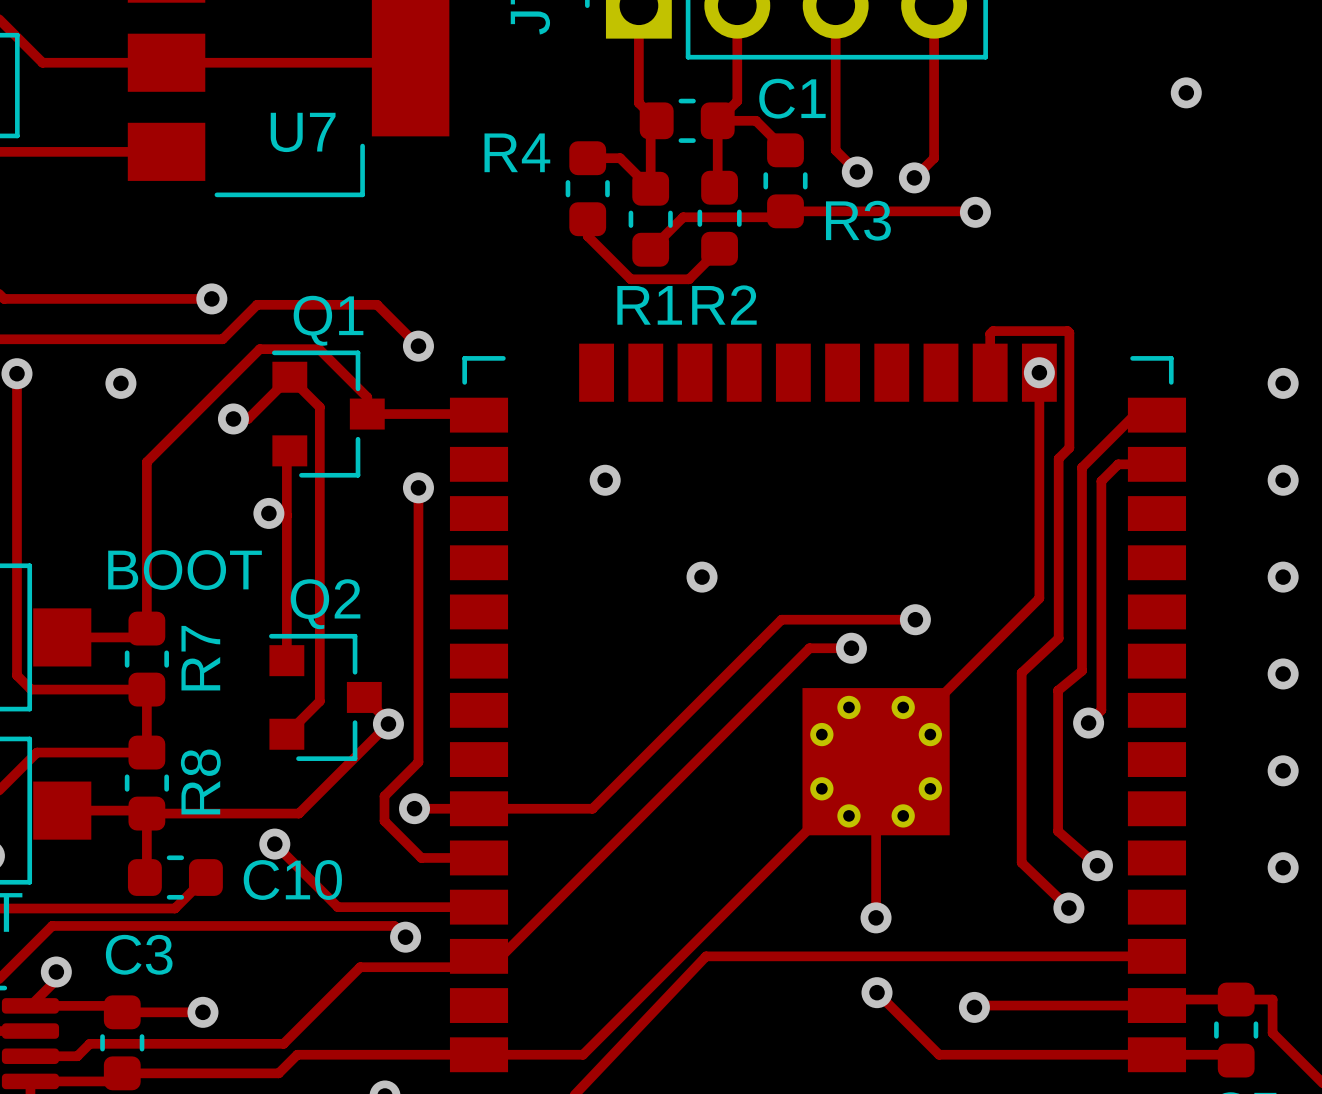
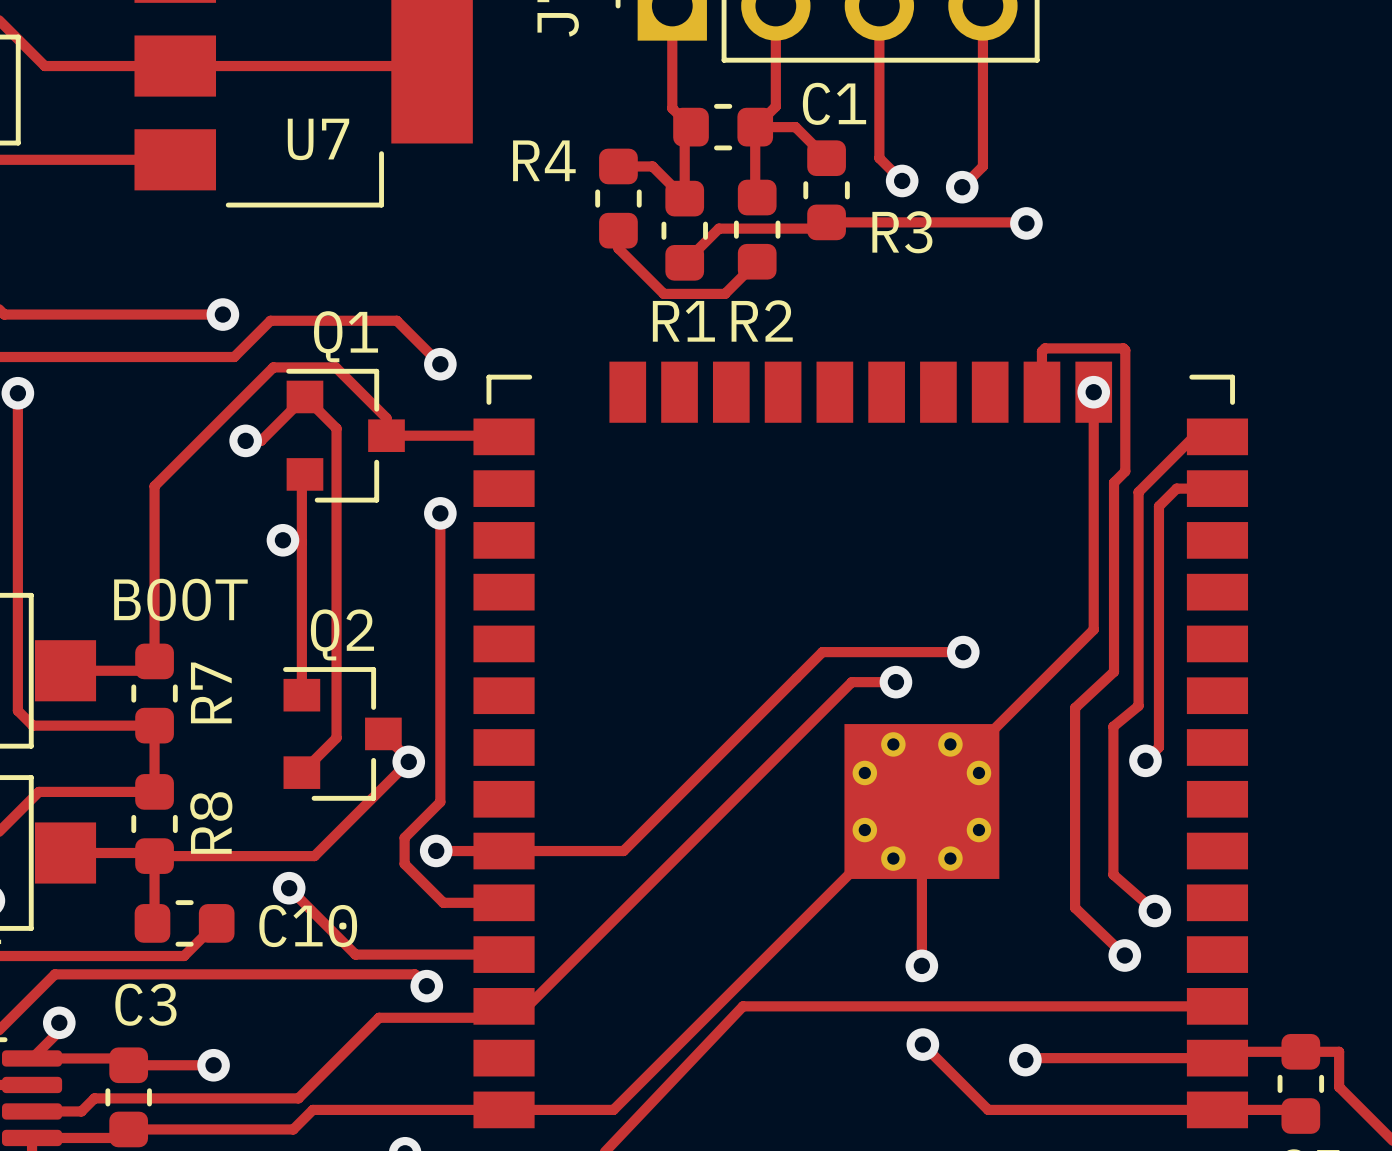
via: (1186, 92) -> none
via: (120, 383) -> none
via: (1283, 383) -> none
via: (605, 480) -> none
via: (1283, 480) -> none
via: (702, 577) -> none
via: (1283, 577) -> none
via: (1283, 673) -> none
via: (1283, 770) -> none
via: (1283, 867) -> none

